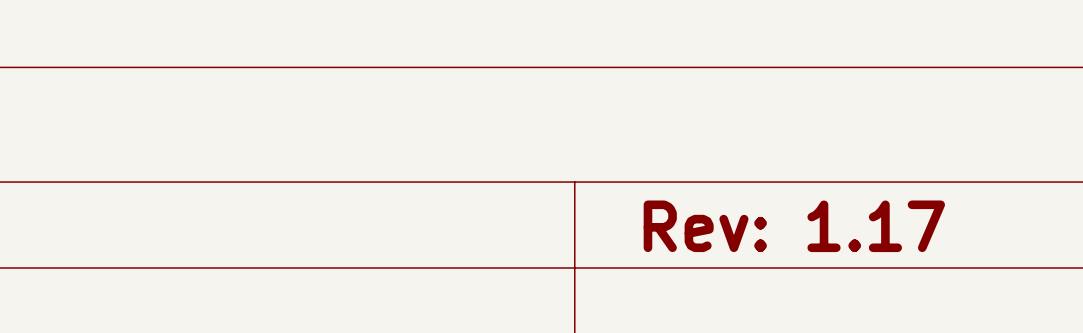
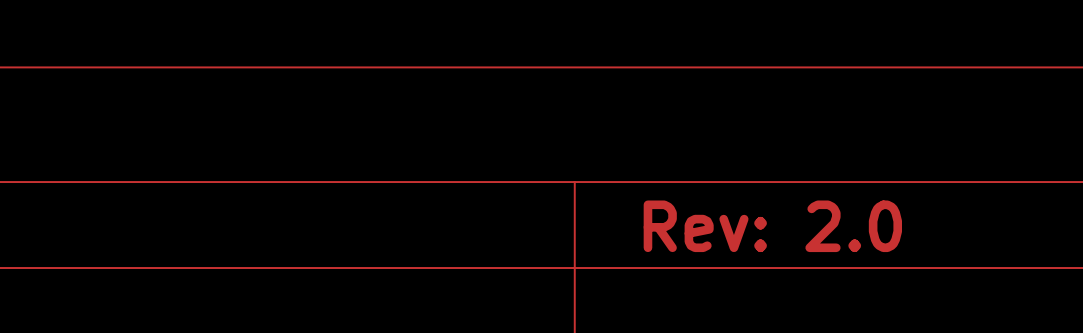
title block: Rev: 1.17 (794, 226) -> Rev: 2.0 (772, 226)

